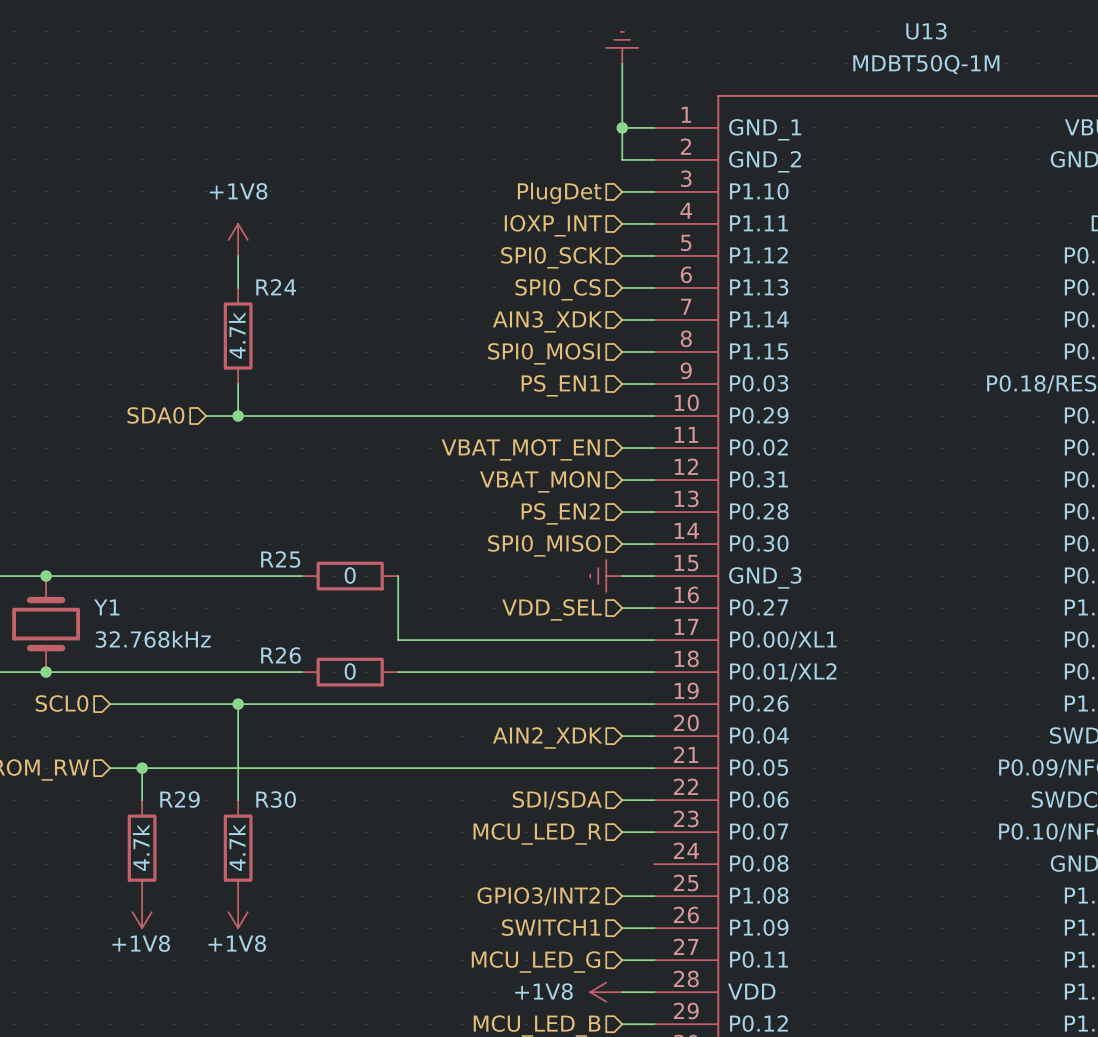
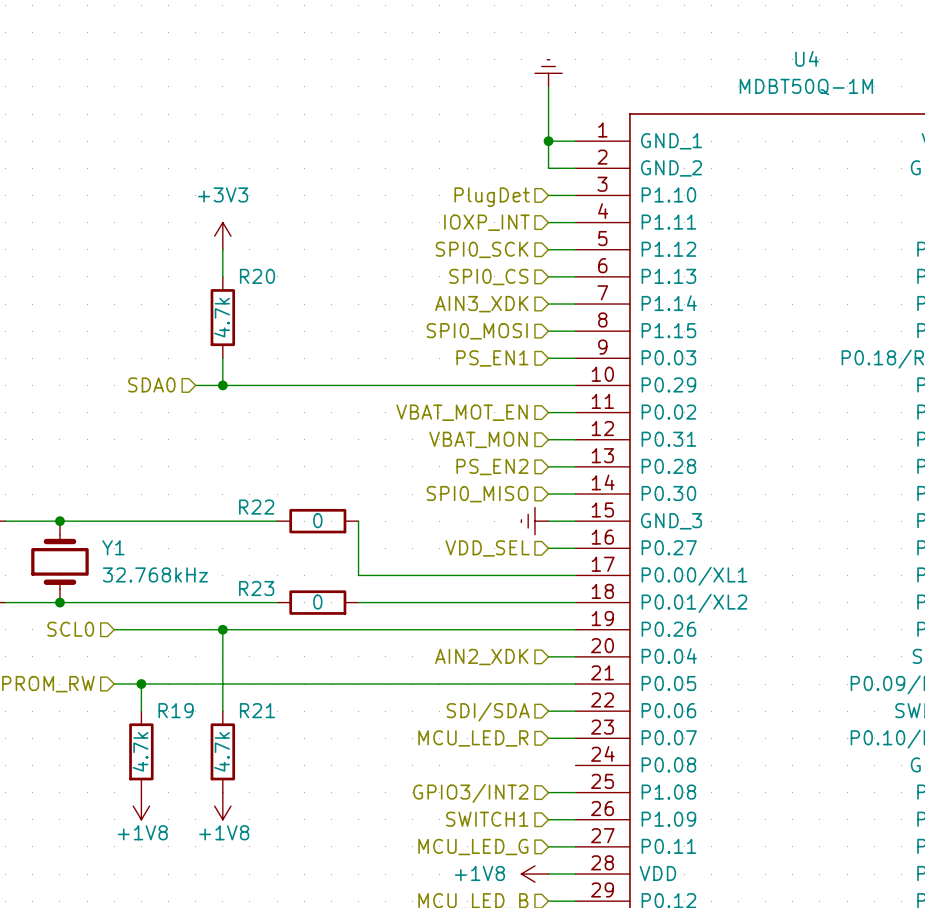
U13 name: U13 (926, 31) -> U4 (807, 58)
power symbol: +1V8 (238, 239) -> +3V3 (222, 236)
R24 name: R24 (276, 287) -> R20 (257, 276)
R25 name: R25 (280, 559) -> R22 (256, 507)
R26 name: R26 (280, 655) -> R23 (256, 588)
R29 name: R29 (180, 799) -> R19 (176, 710)
R30 name: R30 (276, 799) -> R21 (257, 710)

